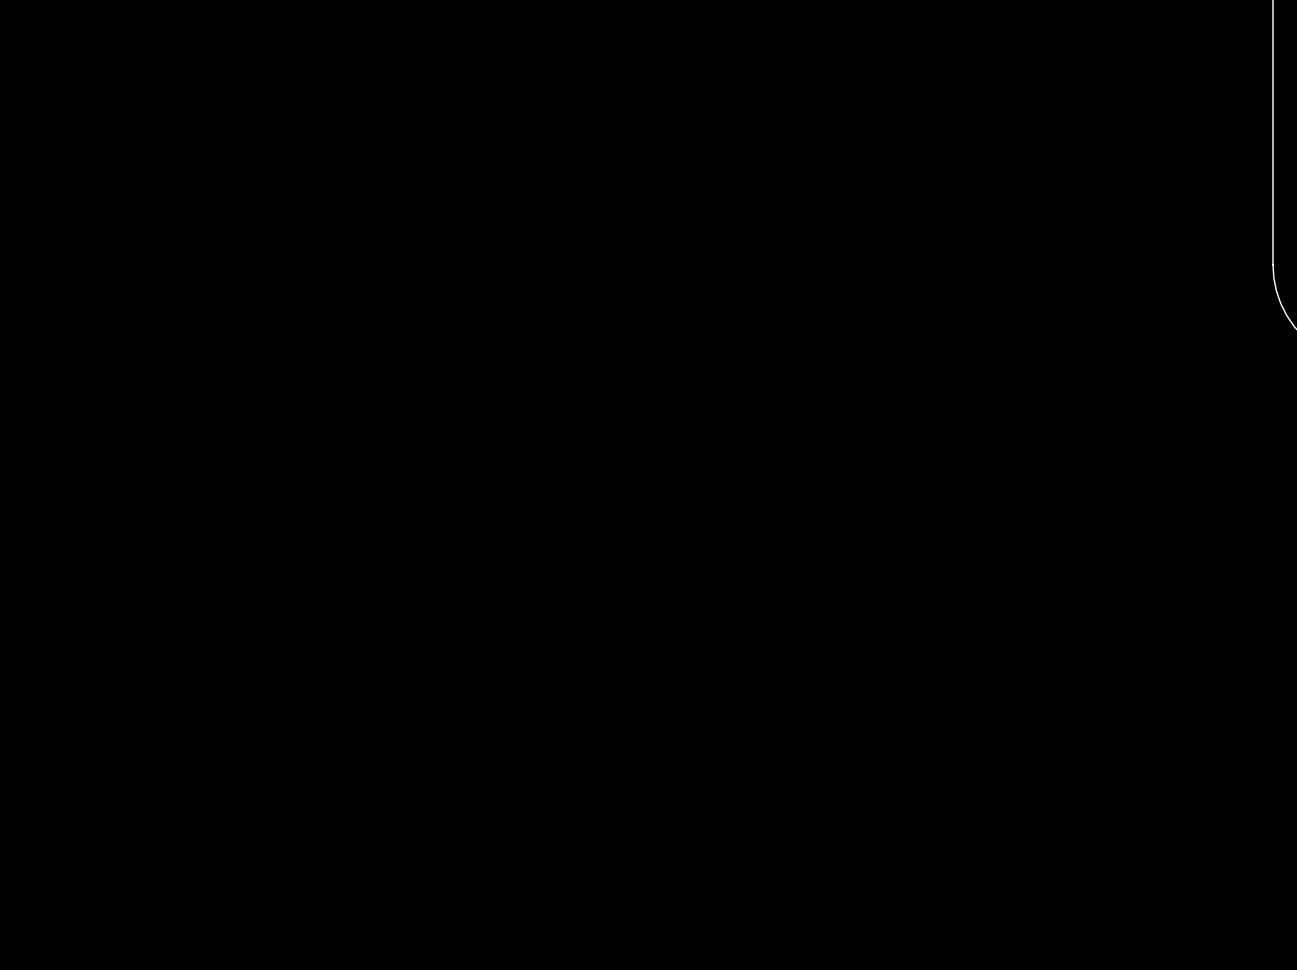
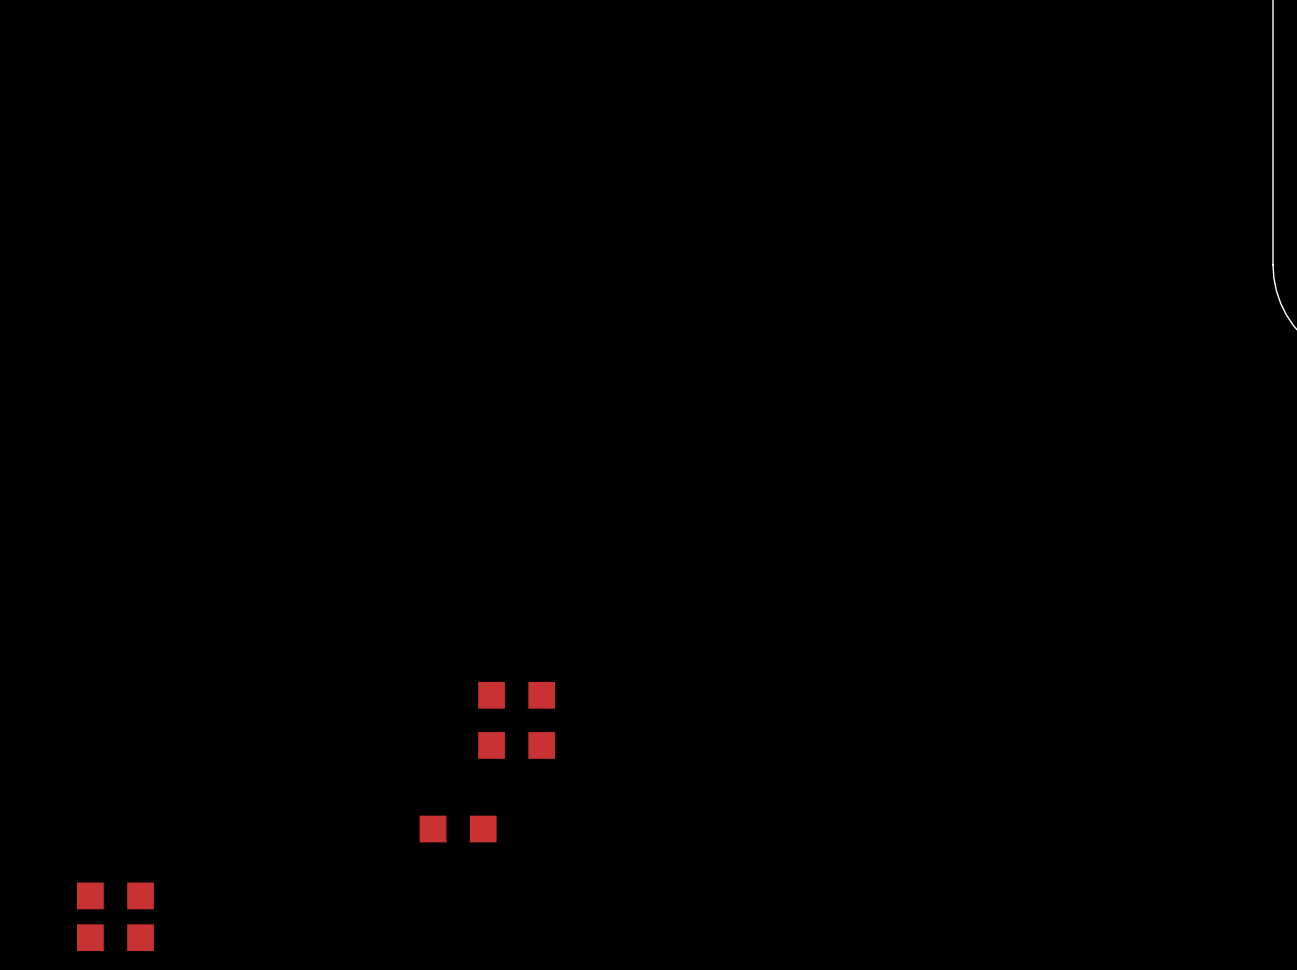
part: none -> (516, 695)
part: none -> (516, 745)
part: none -> (458, 829)
part: none -> (115, 895)
part: none -> (115, 937)

